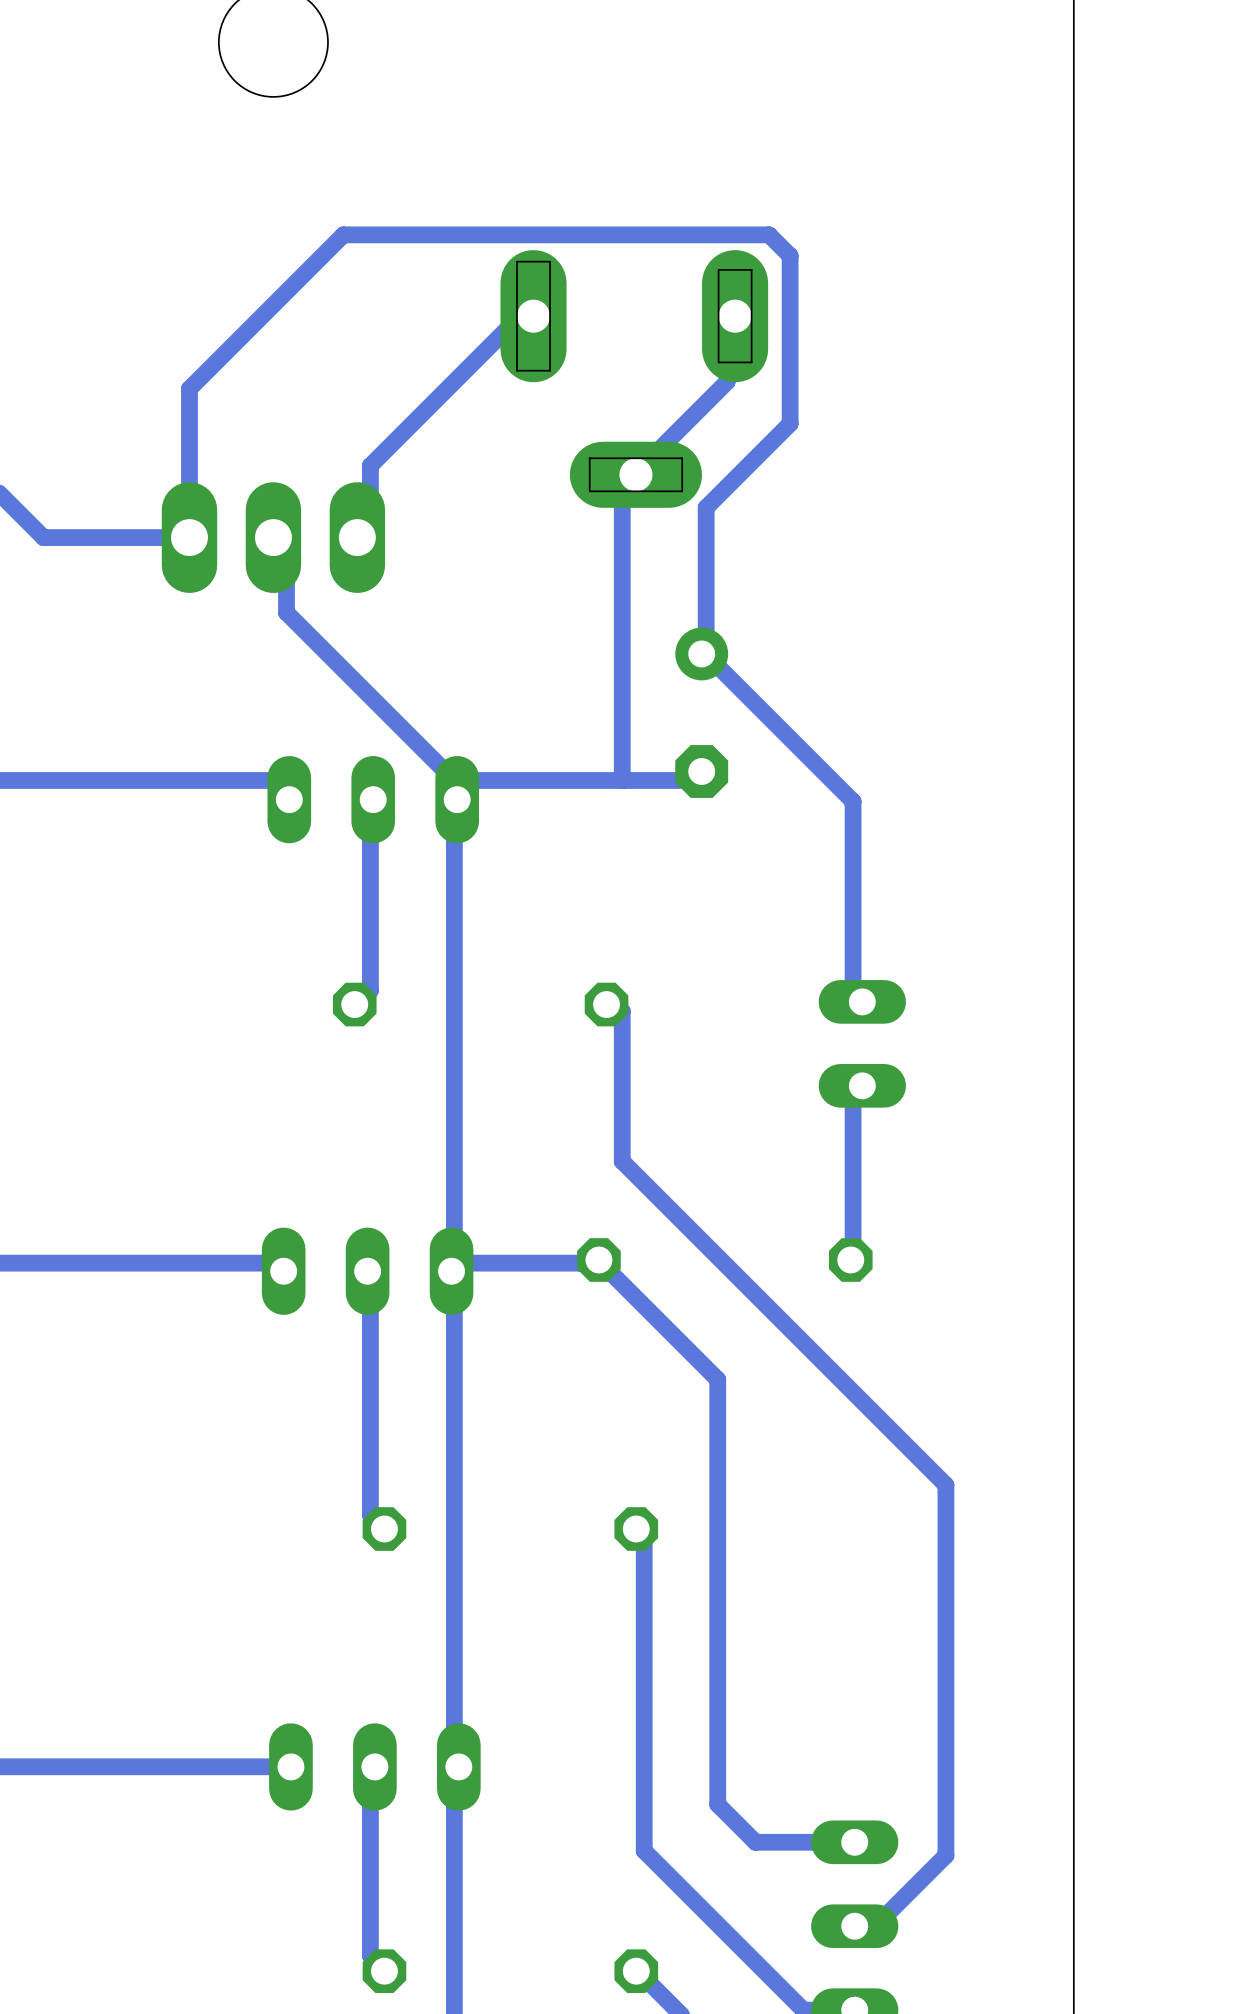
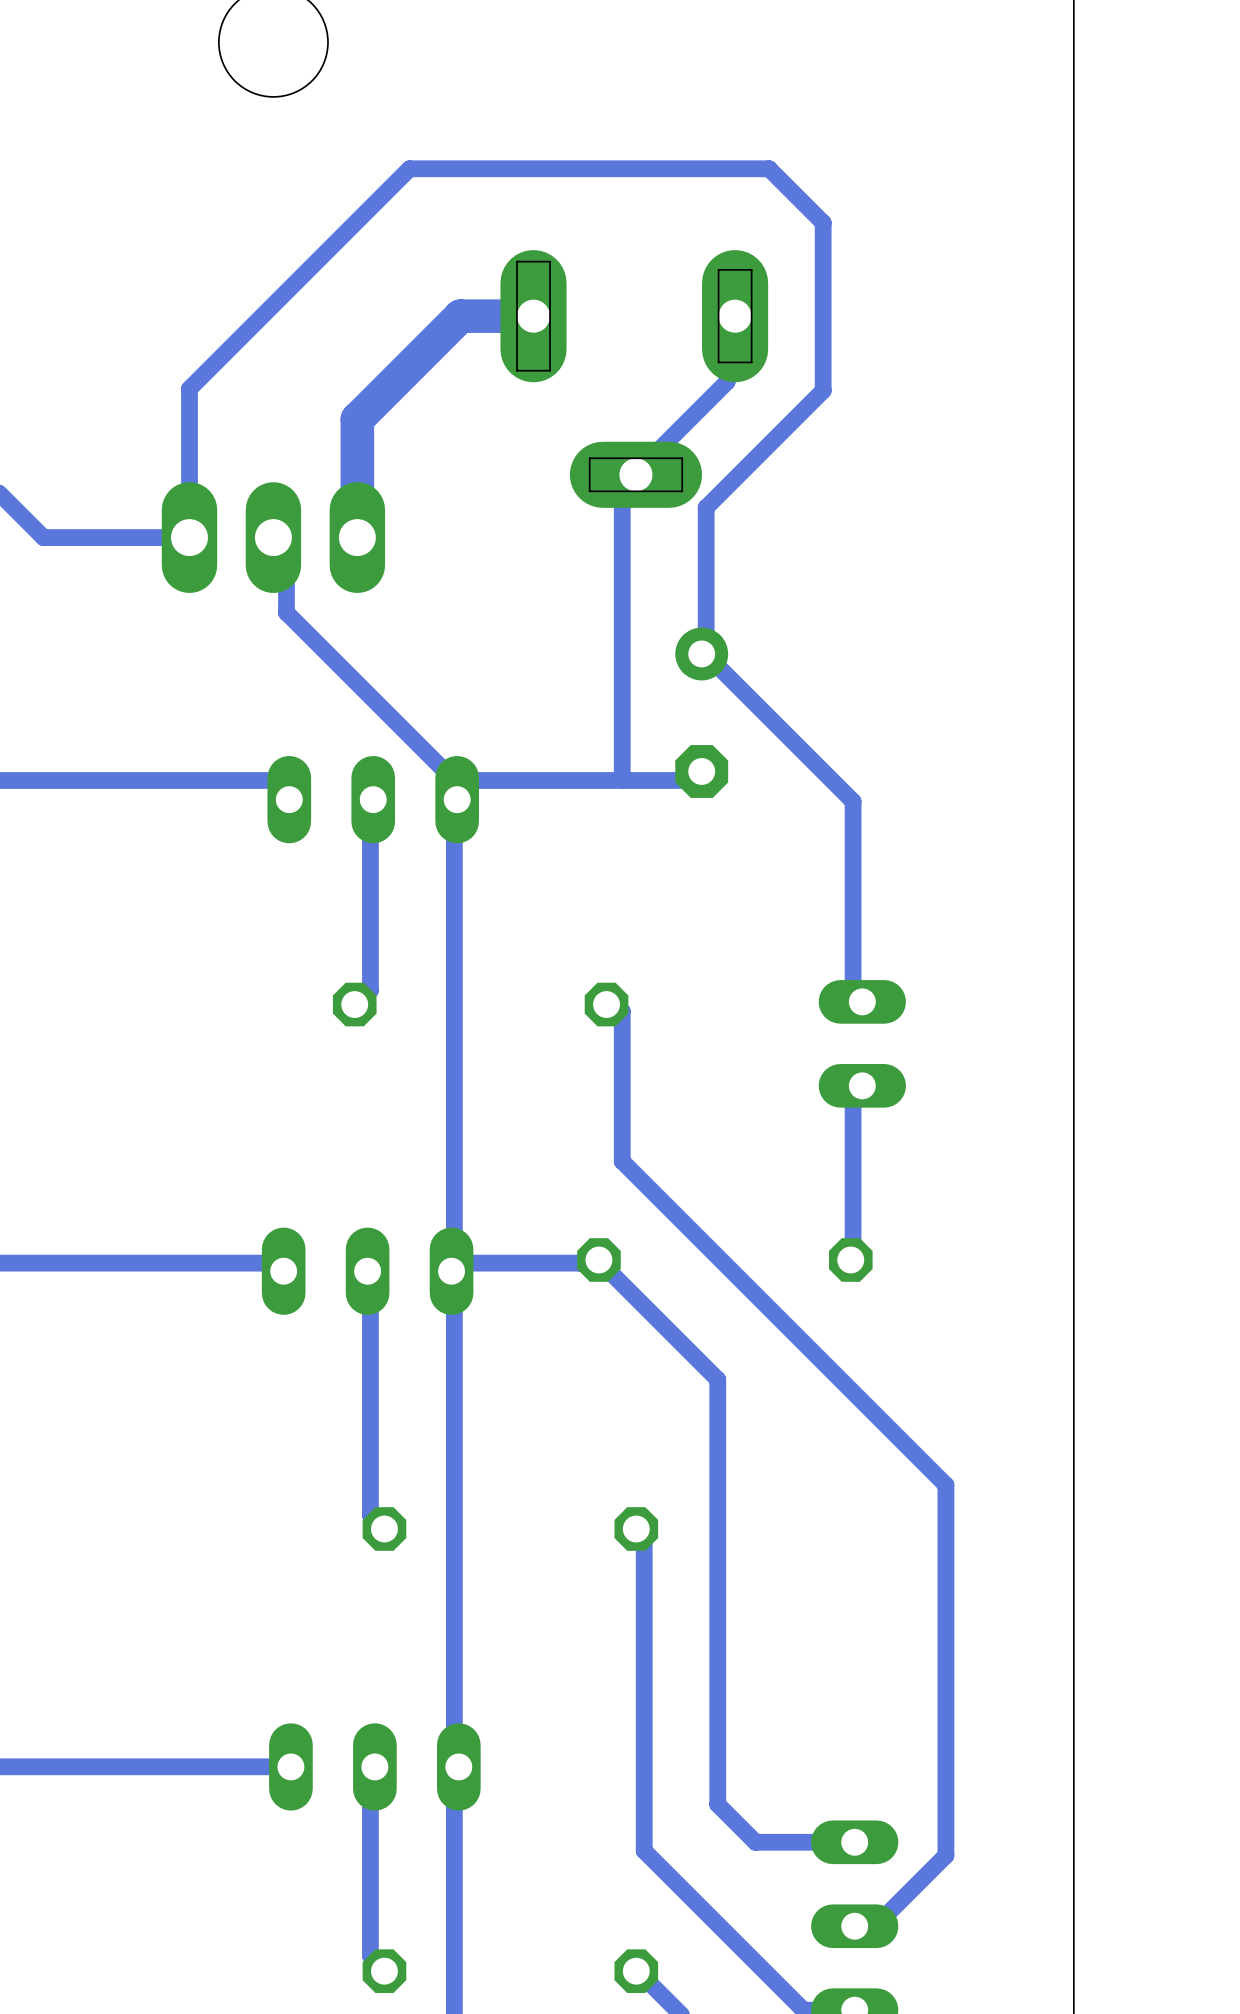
bottom track: (343, 234) (769, 234) (790, 255) (790, 423) -> (343, 234) (409, 168) (769, 168) (823, 222) (823, 390) (790, 423)
bottom track: (533, 316) (517, 318) (370, 465) (370, 528) (357, 537) -> (533, 316) (460, 316) (357, 419) (357, 537)

